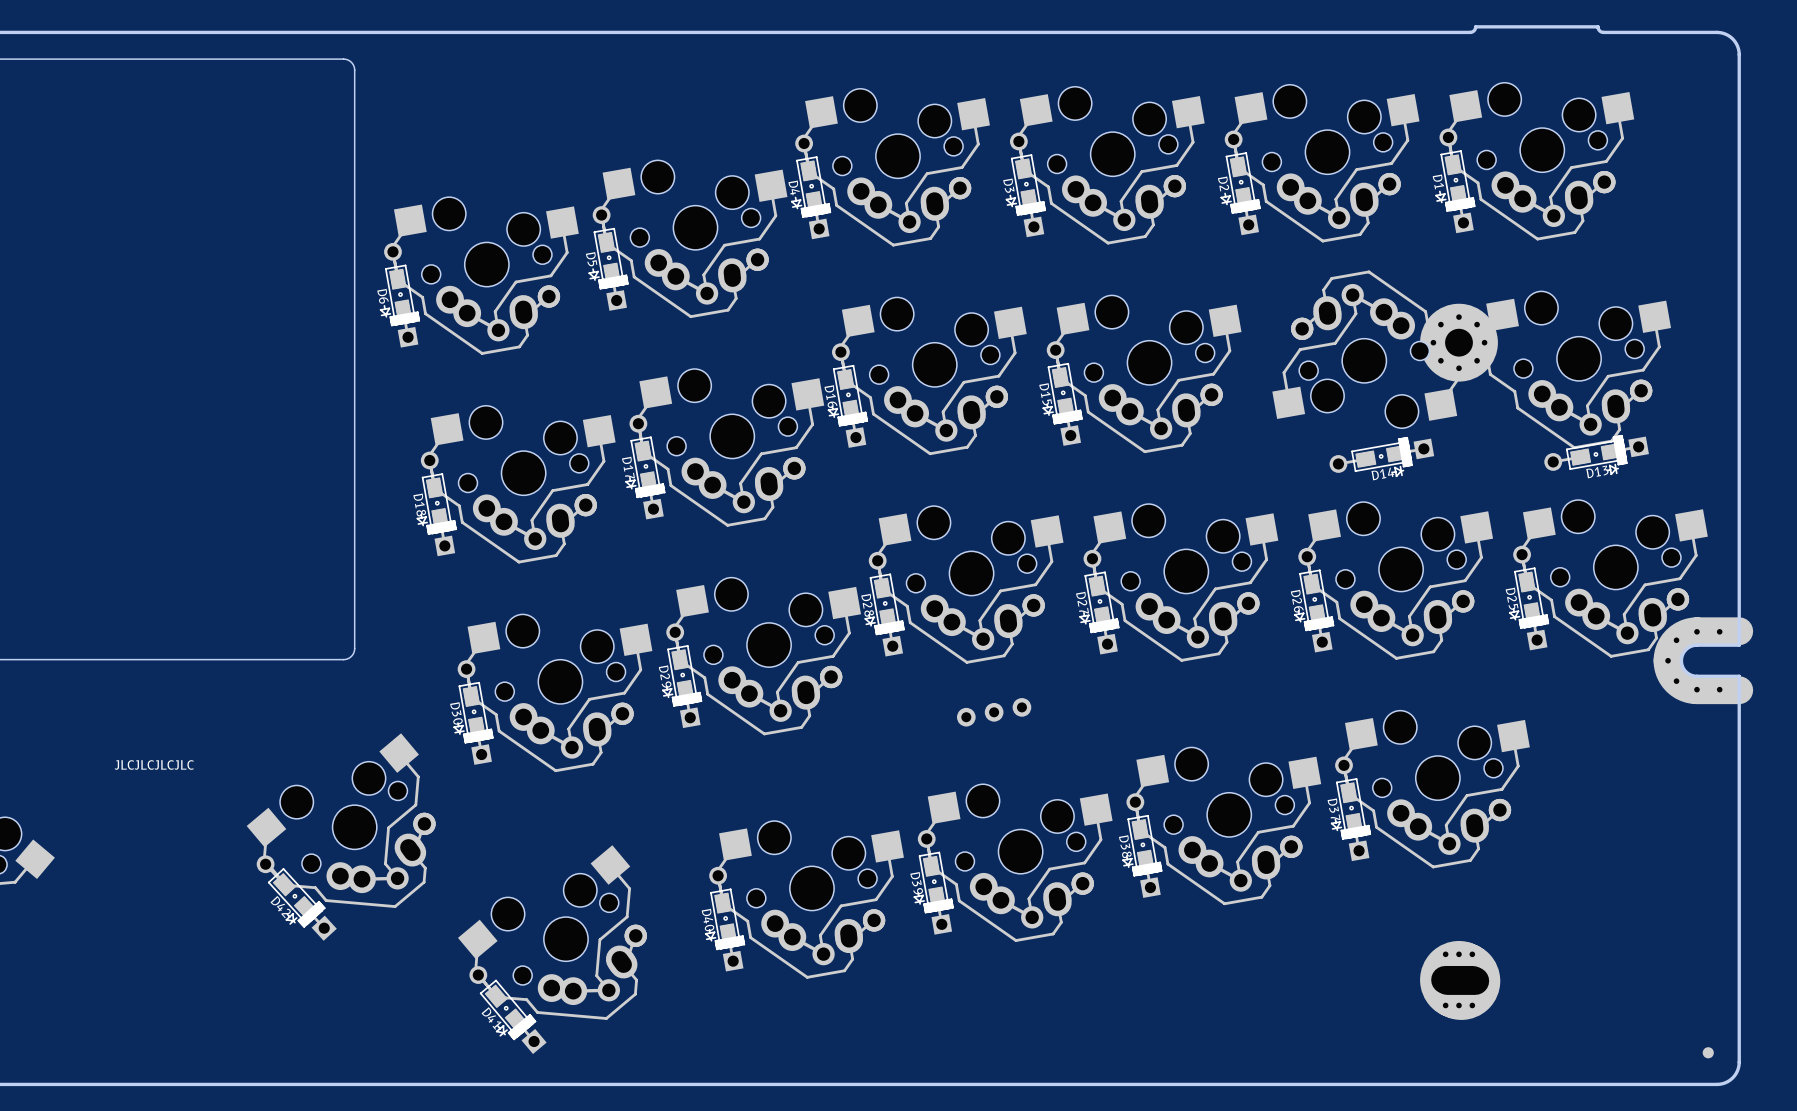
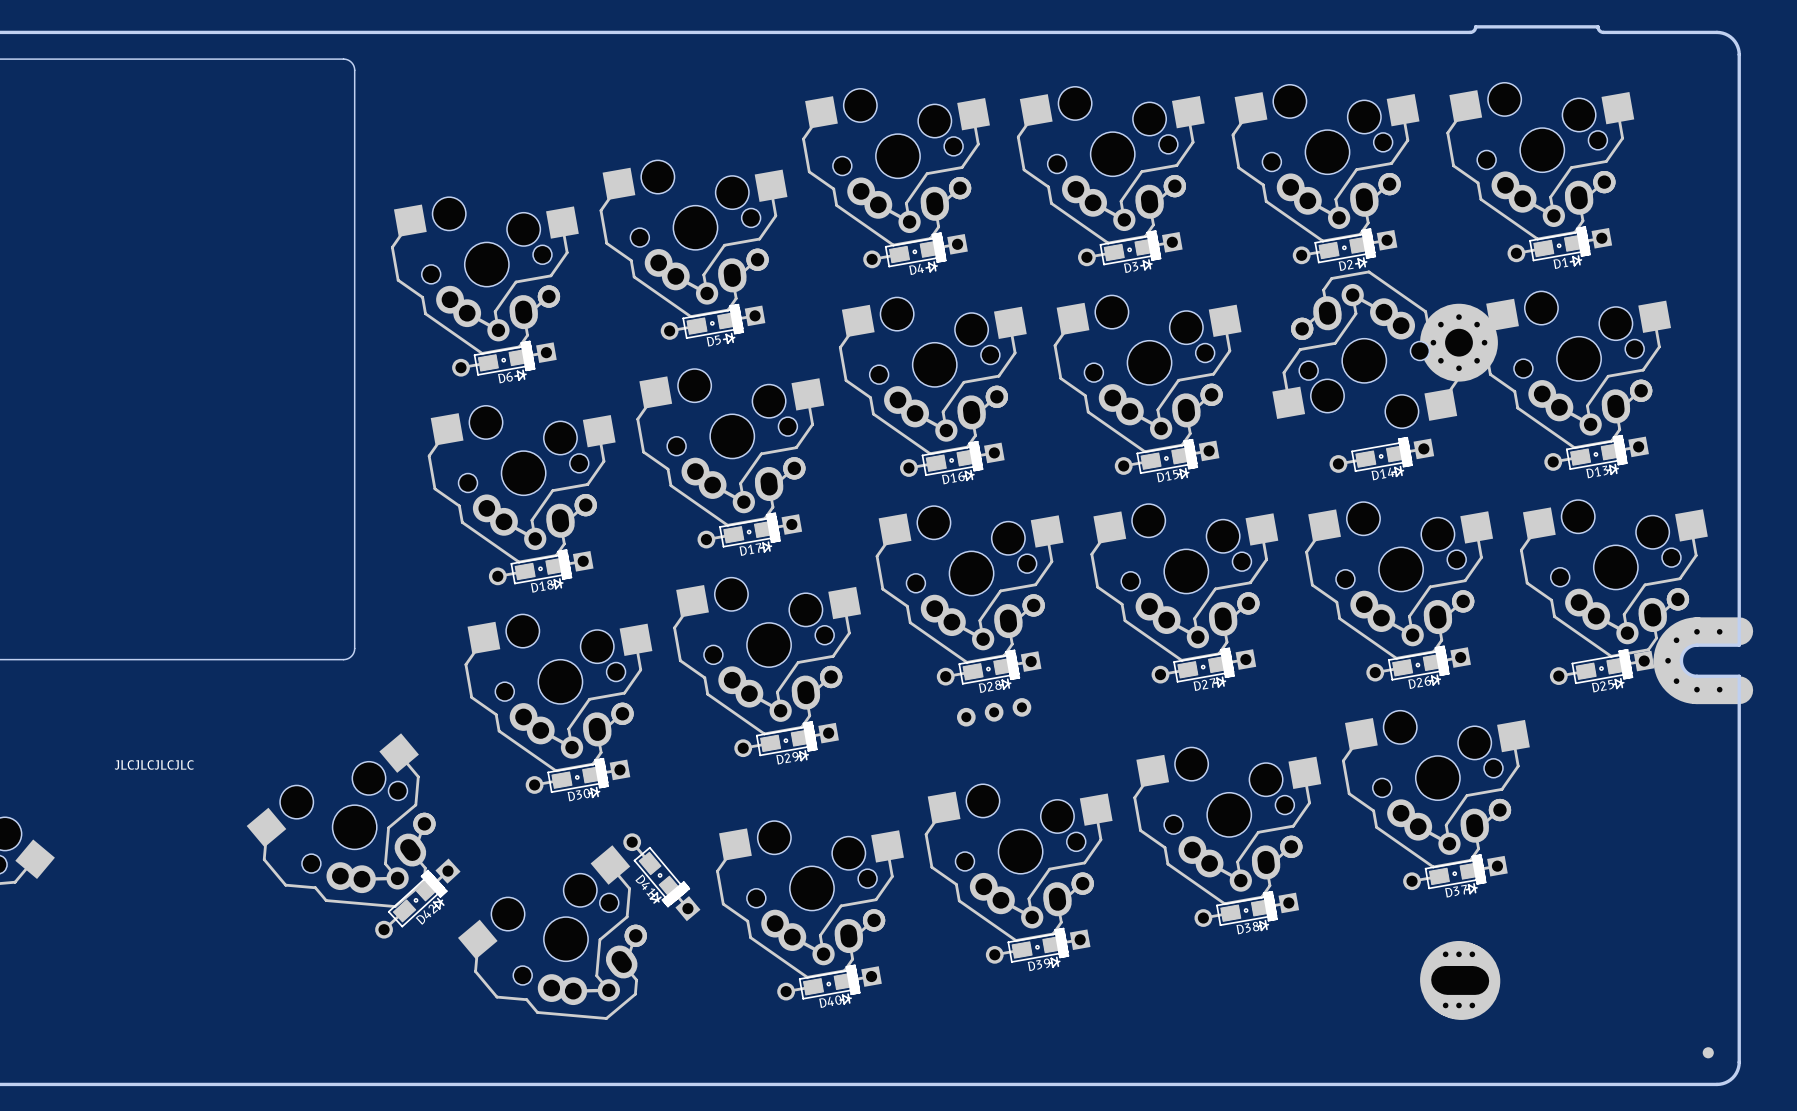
D1 rotation: 0° (1455, 180) -> 90° counterclockwise (1559, 246)
D1 position: (1455, 180) -> (1559, 246)
D2 rotation: 0° (1240, 182) -> 90° counterclockwise (1345, 248)
D2 position: (1240, 182) -> (1345, 248)
D3 rotation: 0° (1025, 184) -> 90° counterclockwise (1130, 250)
D3 position: (1025, 184) -> (1130, 250)
D4 rotation: 0° (811, 186) -> 90° counterclockwise (915, 252)
D4 position: (811, 186) -> (915, 252)
D5 rotation: 0° (608, 258) -> 90° counterclockwise (713, 323)
D5 position: (608, 258) -> (713, 323)
D6 rotation: 0° (399, 295) -> 90° counterclockwise (504, 360)
D6 position: (399, 295) -> (504, 360)
D15 rotation: 0° (1062, 393) -> 90° counterclockwise (1167, 459)
D15 position: (1062, 393) -> (1167, 459)
D16 rotation: 0° (847, 395) -> 90° counterclockwise (952, 461)
D16 position: (847, 395) -> (952, 461)
D17 rotation: 0° (645, 467) -> 90° counterclockwise (749, 532)
D17 position: (645, 467) -> (749, 532)
D18 rotation: 0° (436, 503) -> 90° counterclockwise (541, 569)
D18 position: (436, 503) -> (541, 569)
D25 footprint: [1508, 545, 1550, 651] -> [1549, 649, 1655, 690]
D25 name position: D25 (1512, 598) -> D25 (1602, 686)
D26 rotation: 0° (1314, 600) -> 90° counterclockwise (1418, 665)
D26 position: (1314, 600) -> (1418, 665)
D27 rotation: 0° (1099, 602) -> 90° counterclockwise (1203, 667)
D27 position: (1099, 602) -> (1203, 667)
D28 rotation: 0° (884, 604) -> 90° counterclockwise (989, 669)
D28 position: (884, 604) -> (989, 669)
D29 rotation: 0° (682, 675) -> 90° counterclockwise (786, 741)
D29 position: (682, 675) -> (786, 741)
D30 rotation: 0° (473, 712) -> 90° counterclockwise (577, 778)
D30 position: (473, 712) -> (577, 778)
D37 rotation: 0° (1350, 808) -> 90° counterclockwise (1455, 874)
D37 position: (1350, 808) -> (1455, 874)
D38 rotation: 0° (1142, 845) -> 90° counterclockwise (1246, 911)
D38 position: (1142, 845) -> (1246, 911)
D39 rotation: 0° (933, 882) -> 90° counterclockwise (1038, 947)
D39 position: (933, 882) -> (1038, 947)
D42 rotation: 0° (296, 898) -> 90° counterclockwise (417, 898)
D42 position: (296, 898) -> (417, 898)
D40 rotation: 0° (725, 919) -> 90° counterclockwise (829, 984)
D40 position: (725, 919) -> (829, 984)
D41 position: (508, 1010) -> (661, 877)

